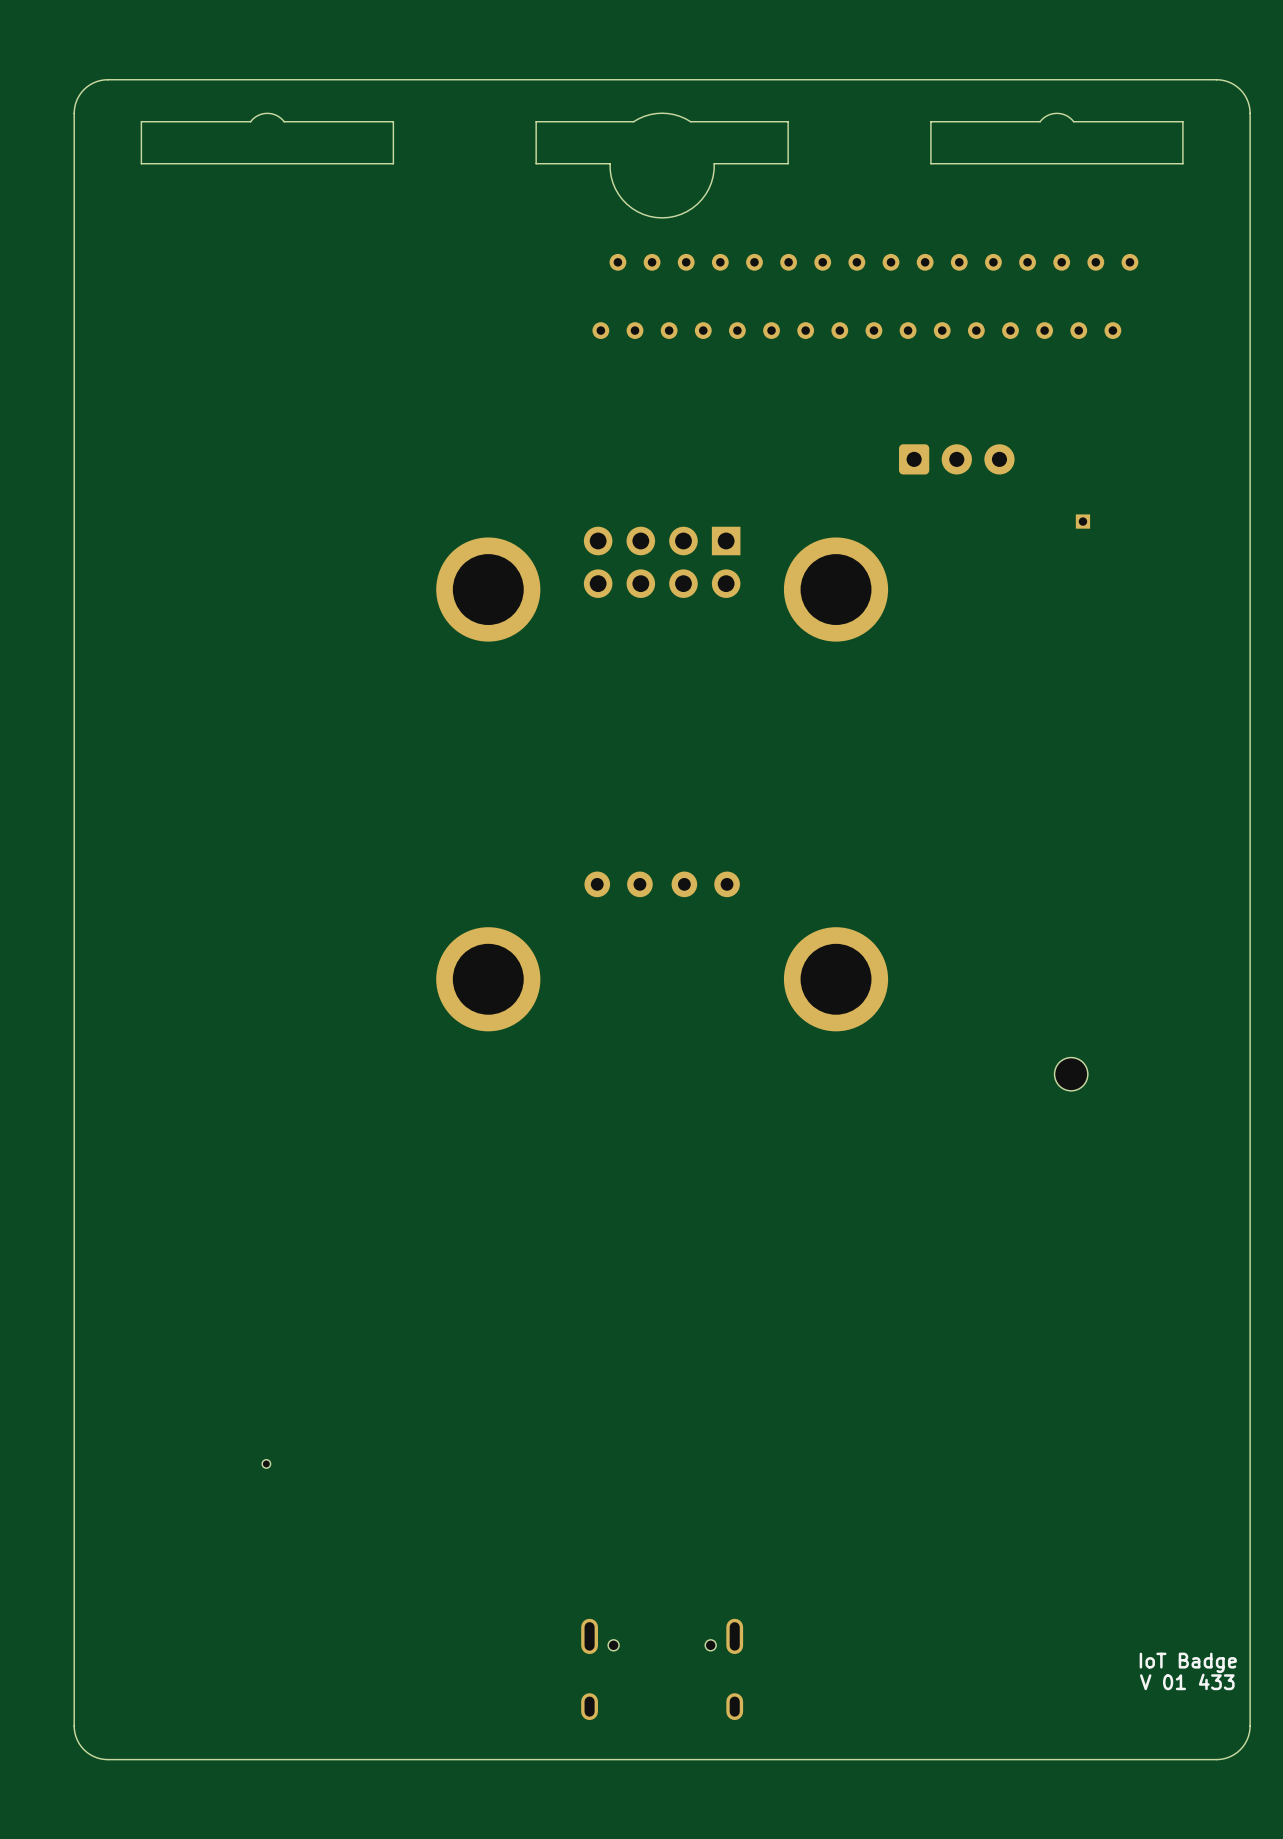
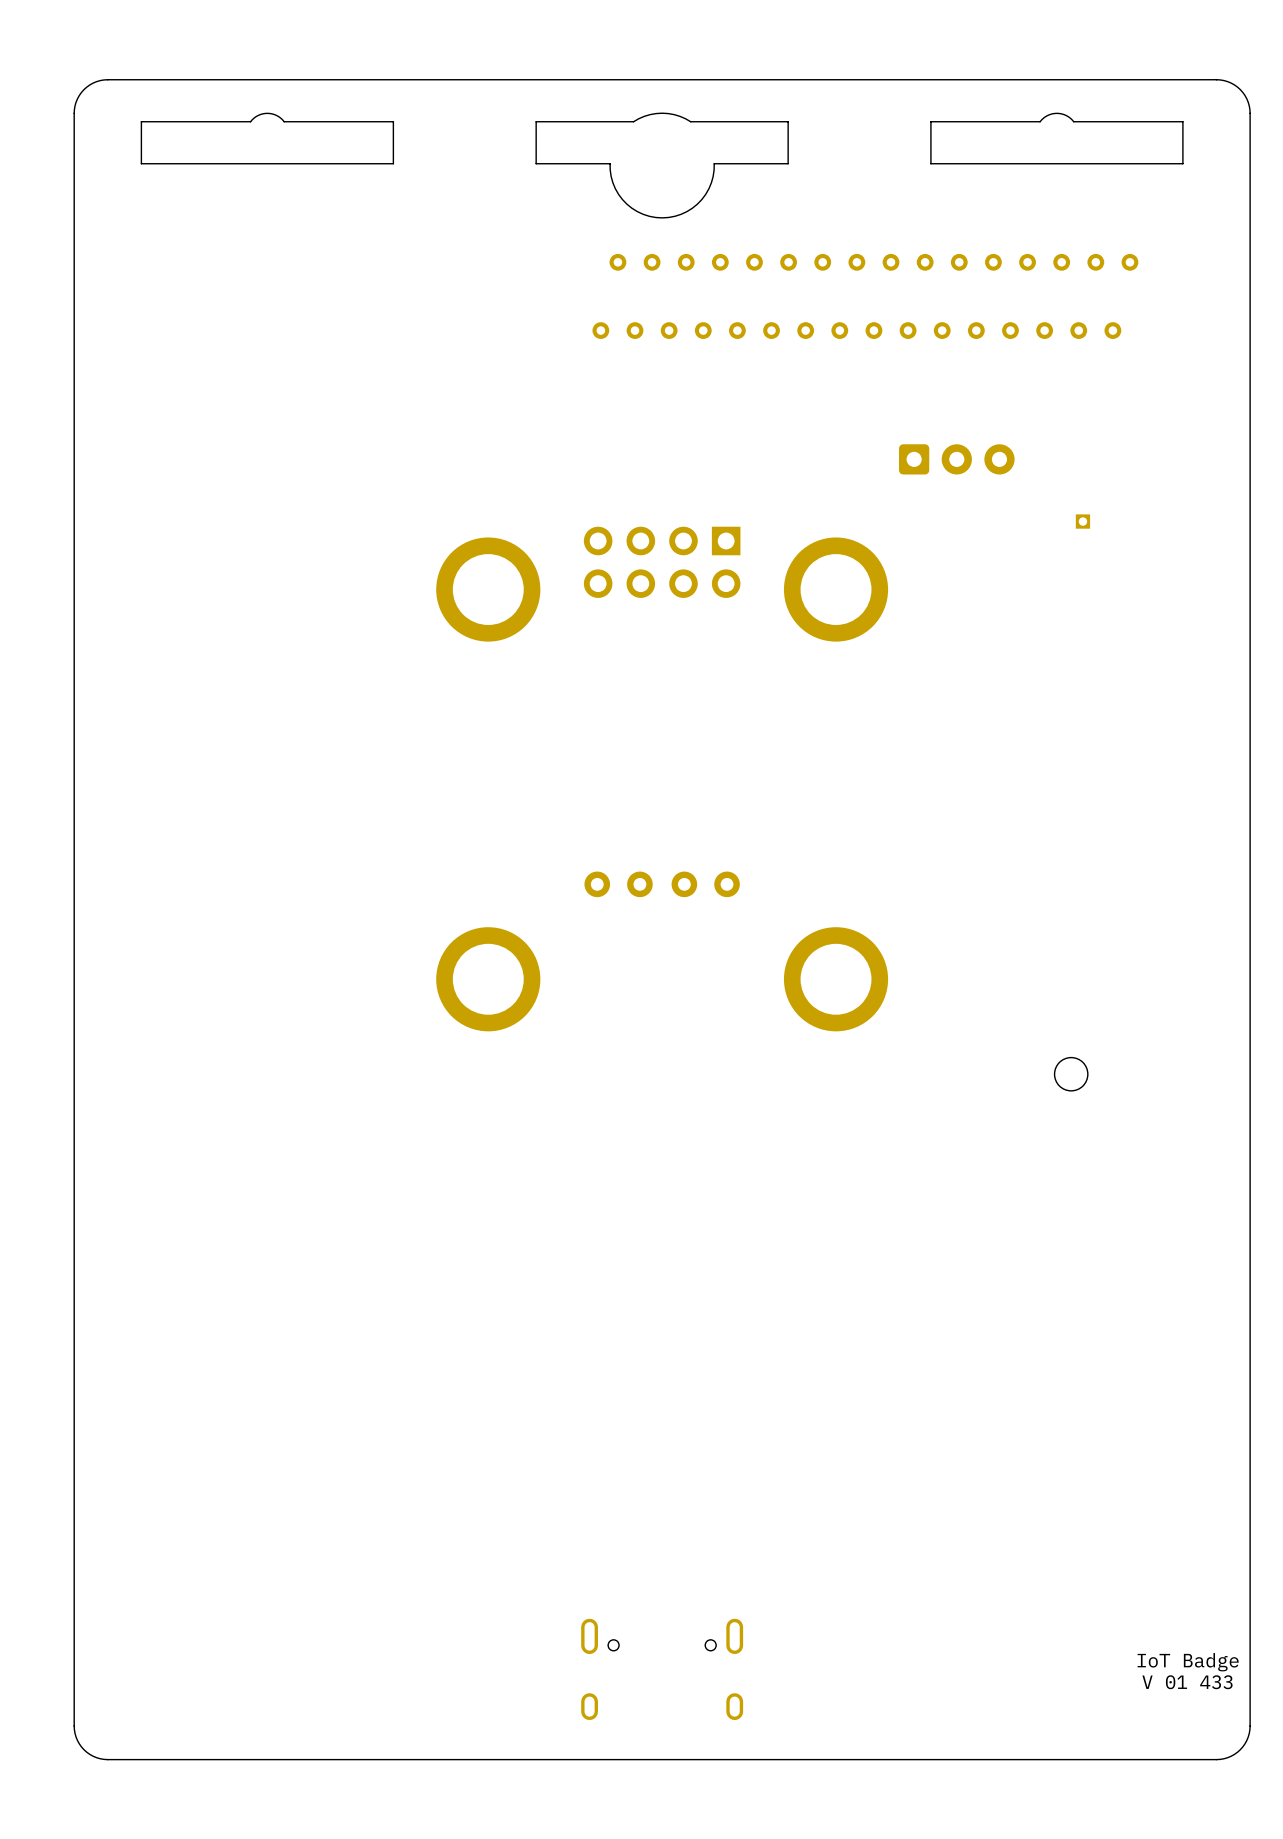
part: (266, 1463) -> none

